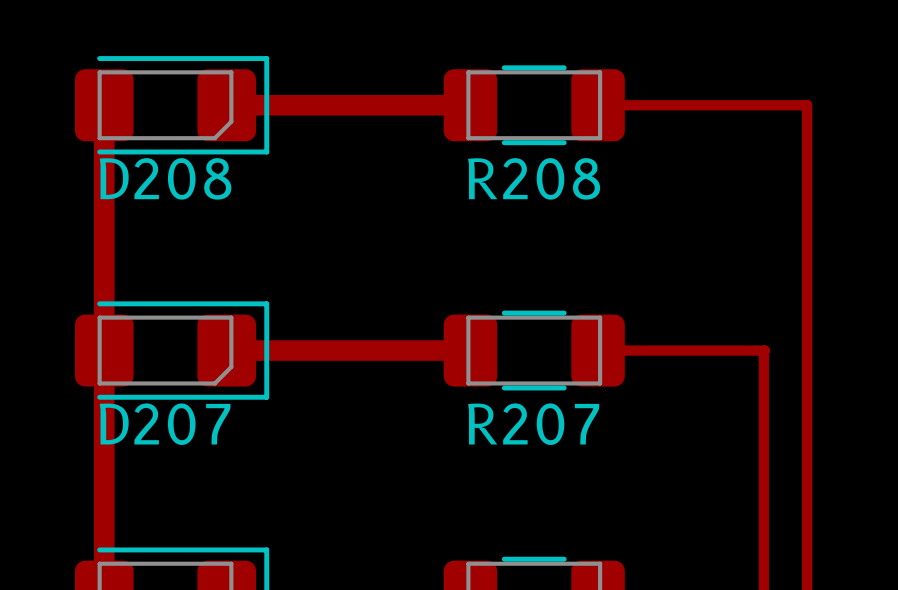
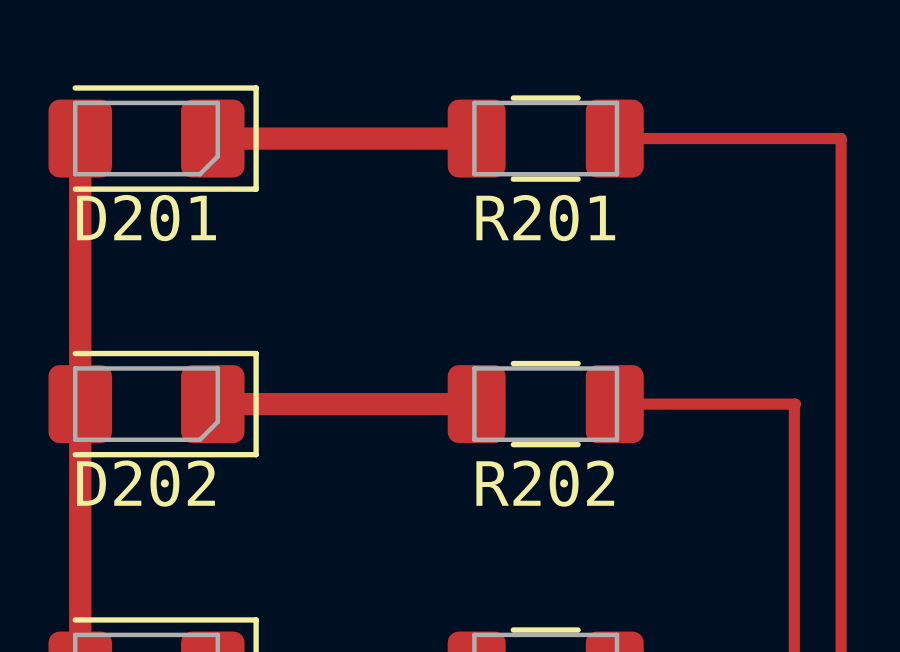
D208 name: D208 (165, 178) -> D201 (146, 218)
R208 name: R208 (534, 178) -> R201 (545, 218)
D207 name: D207 (165, 424) -> D202 (145, 483)
R207 name: R207 (533, 424) -> R202 (545, 483)

